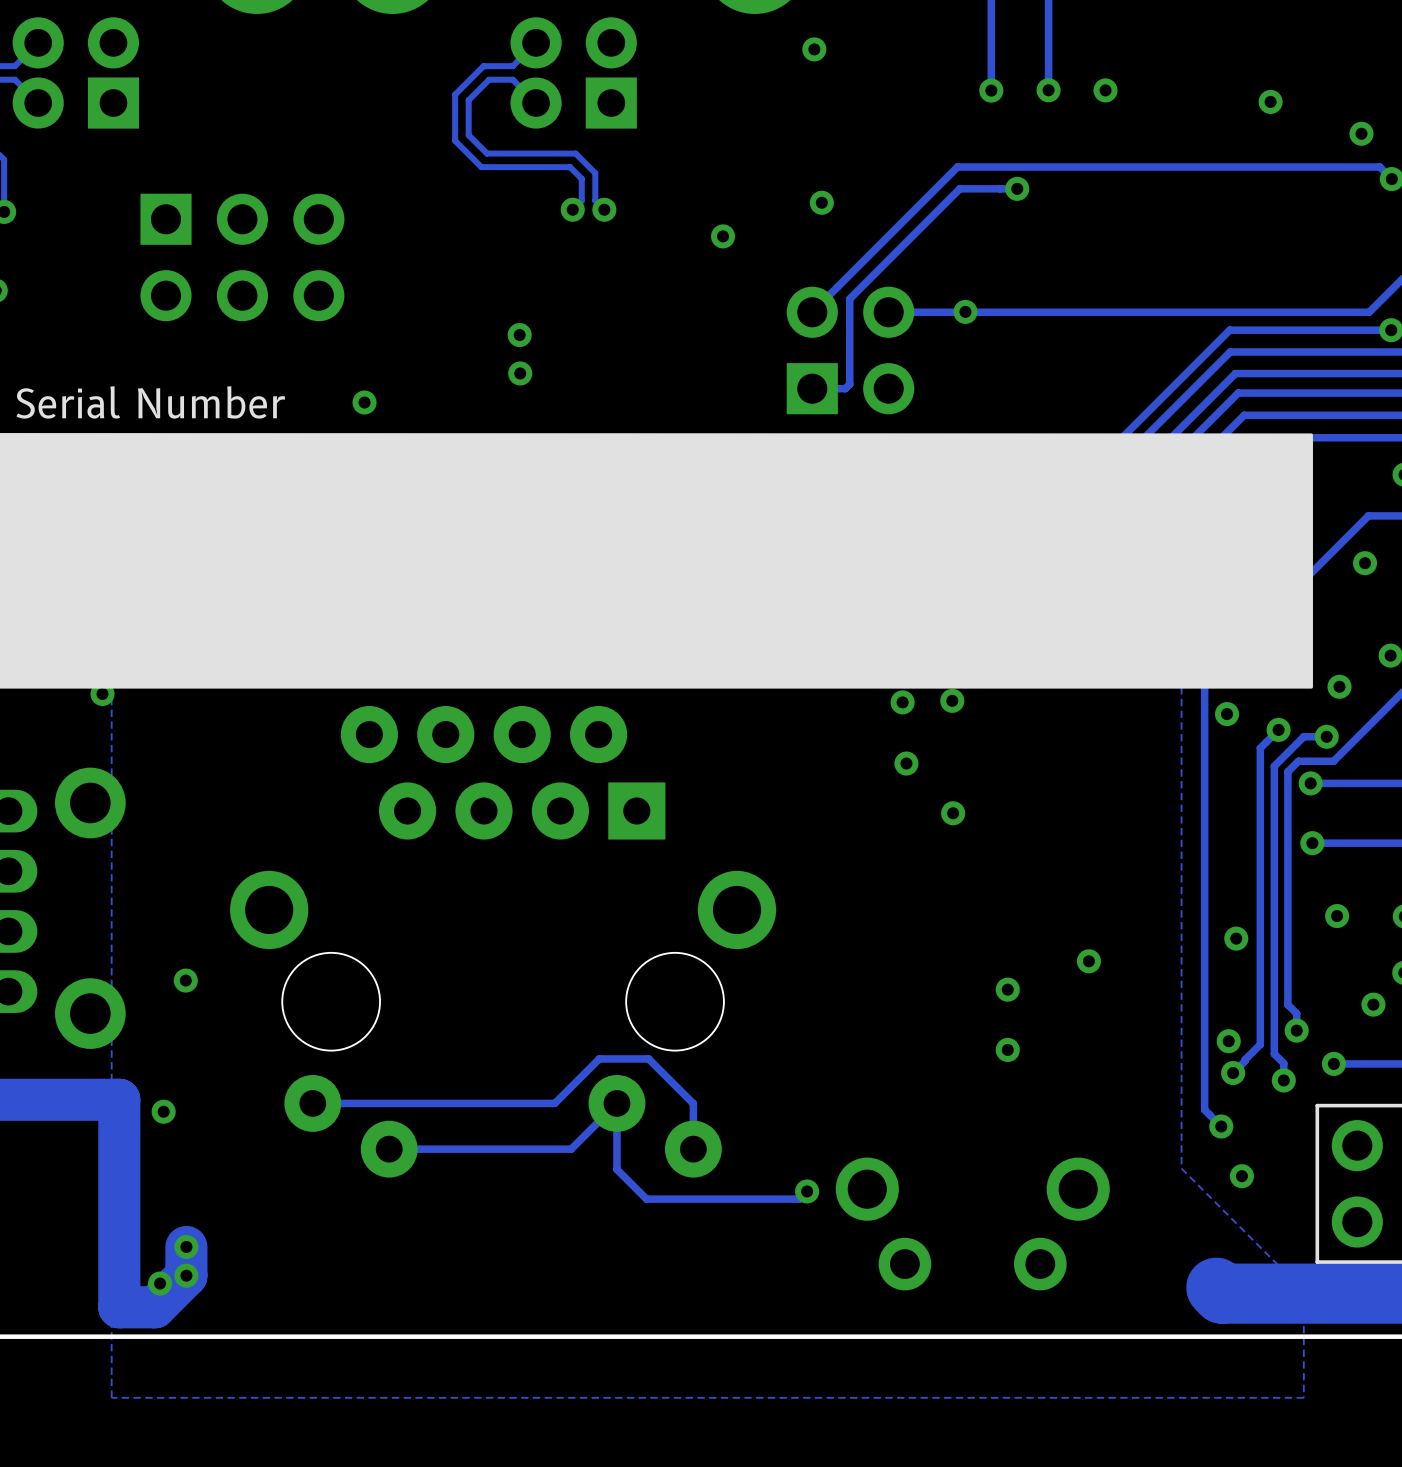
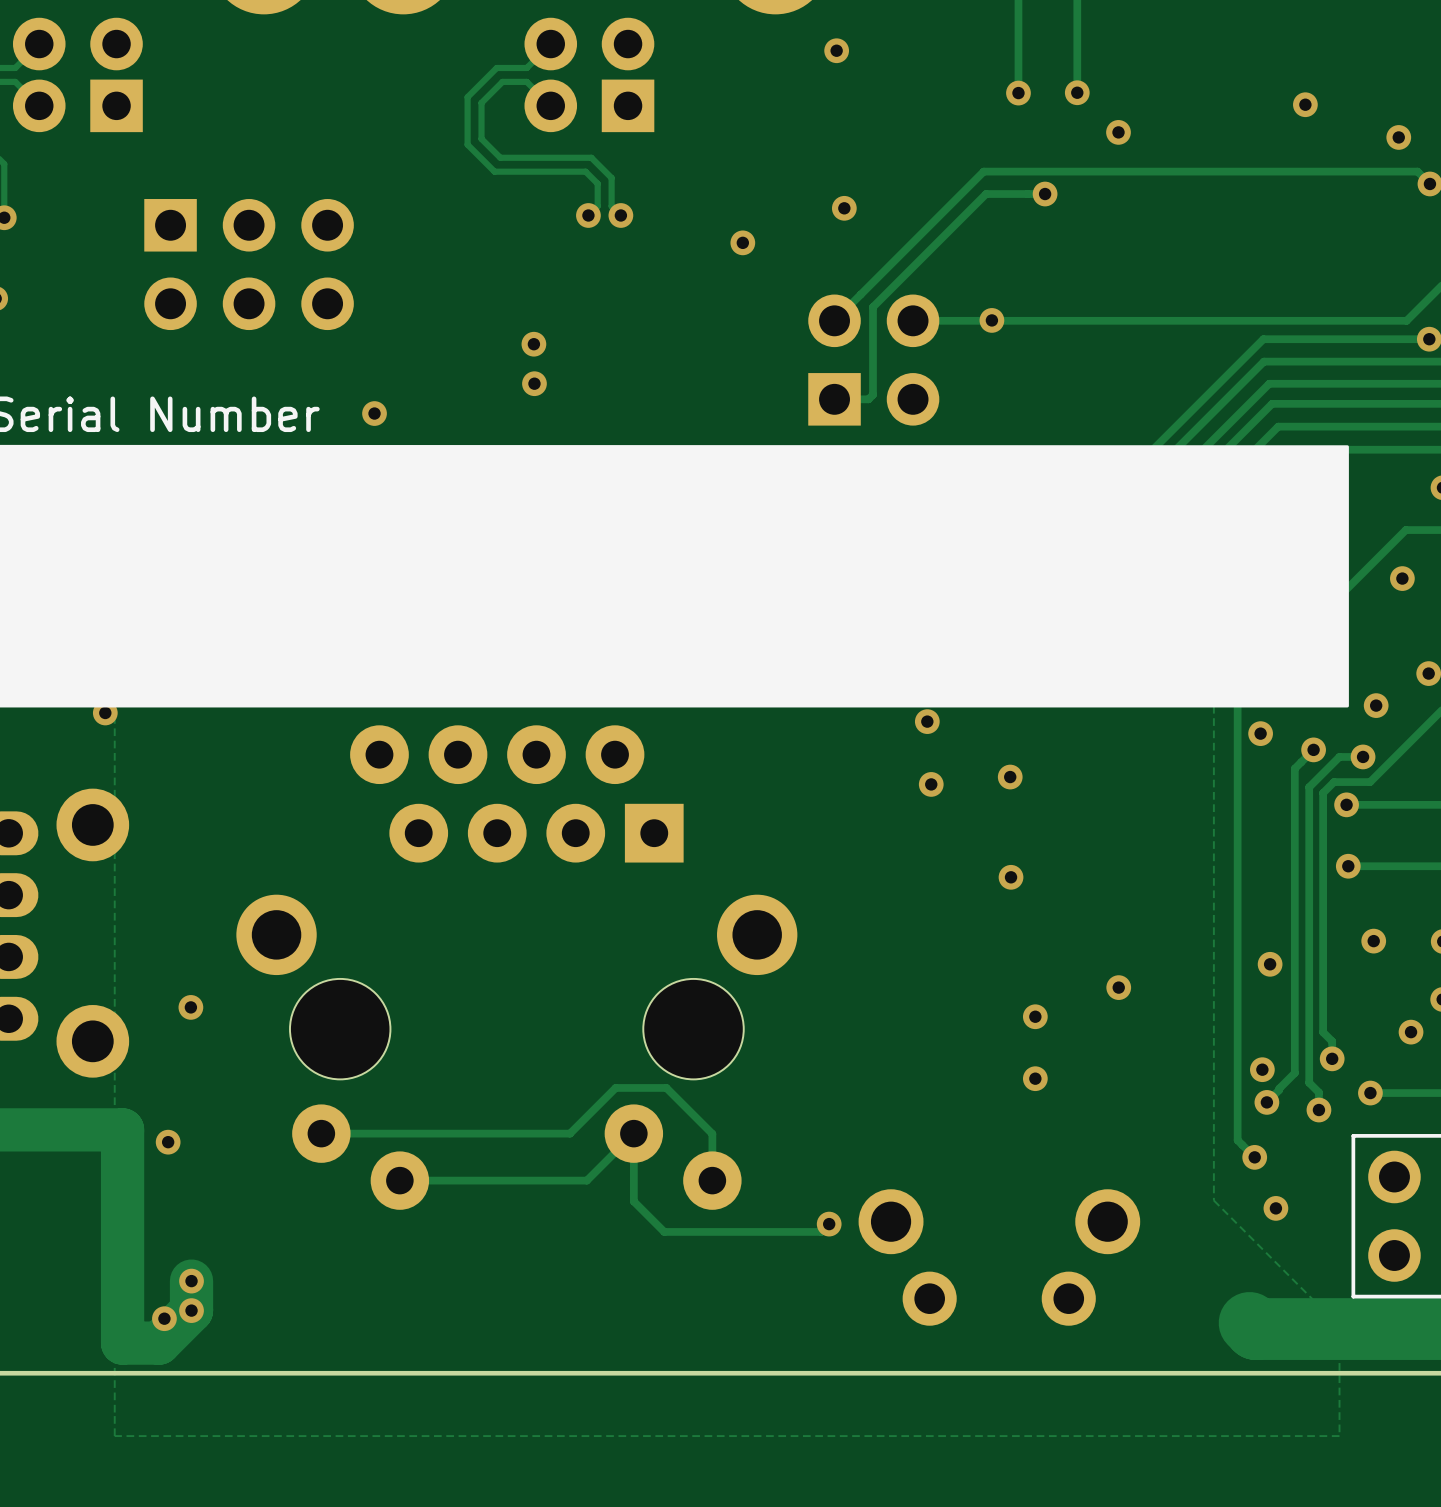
via position: (1105, 90) -> (1118, 132)
via: (952, 700) -> none
via: none -> (1010, 777)
via: (953, 813) -> none
via: none -> (1011, 877)

